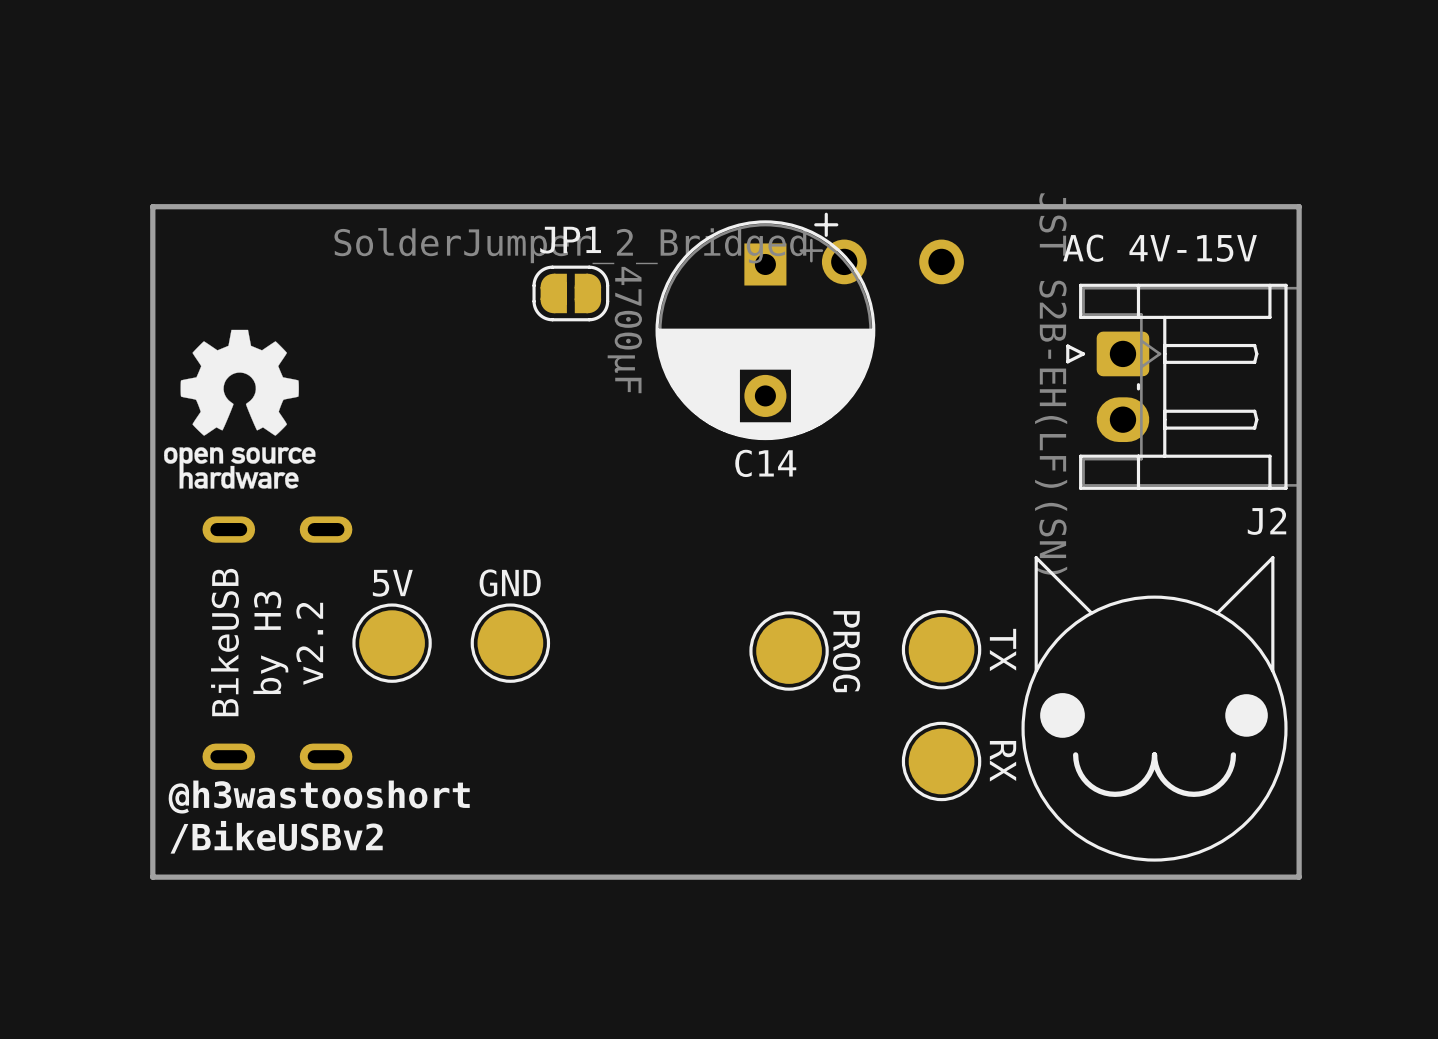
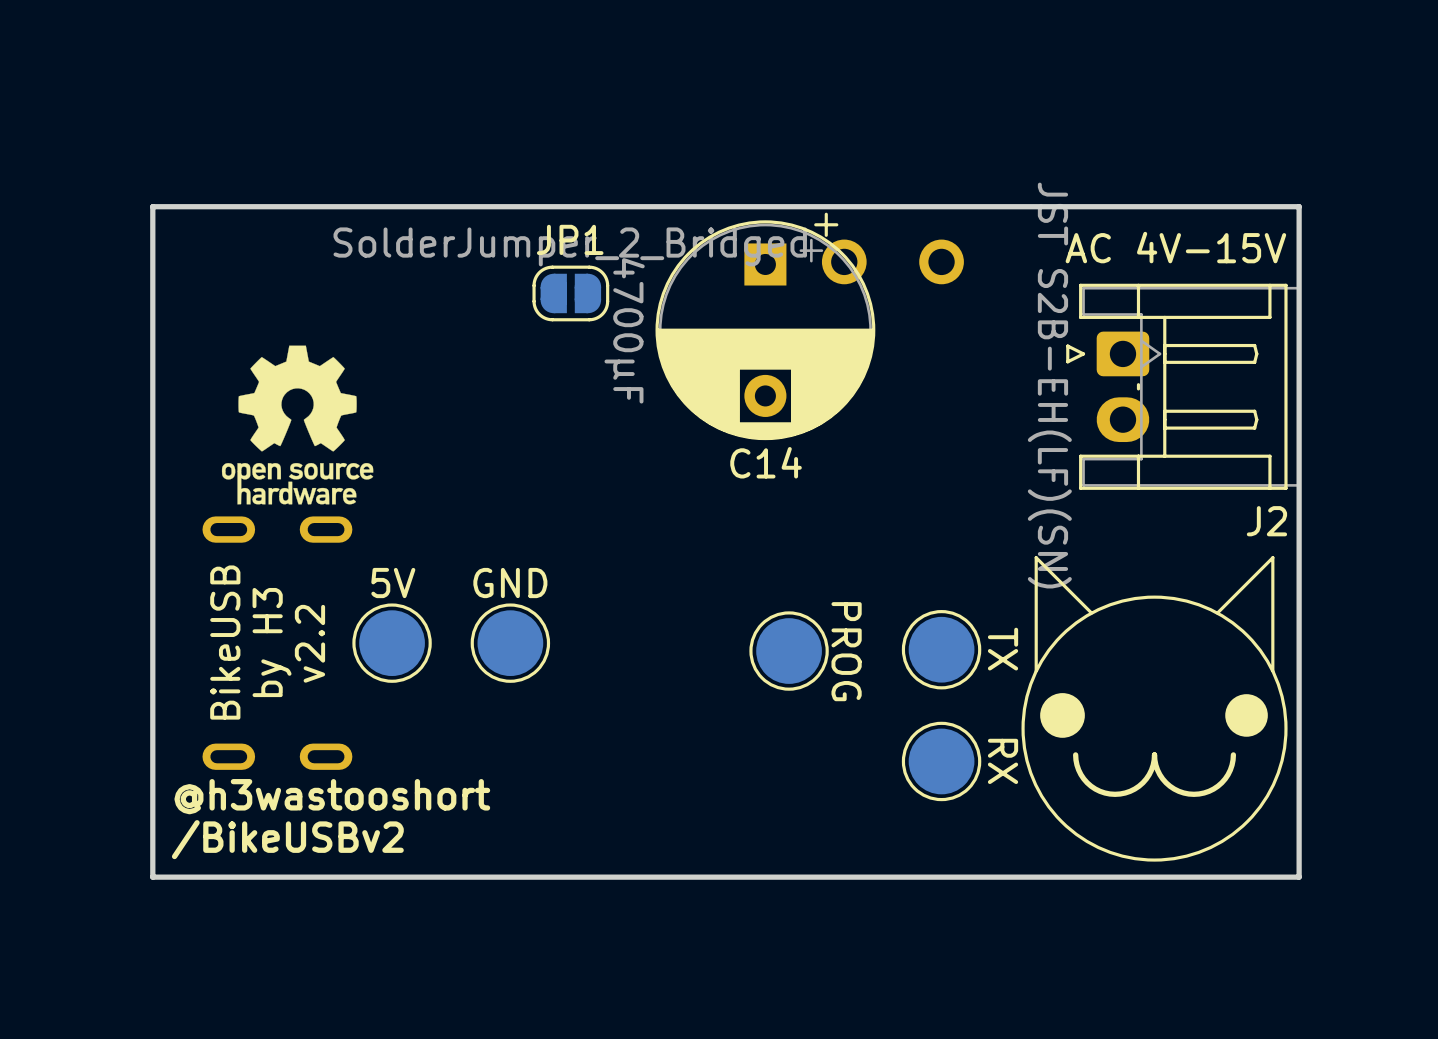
drawing position: (239, 409) -> (297, 425)

